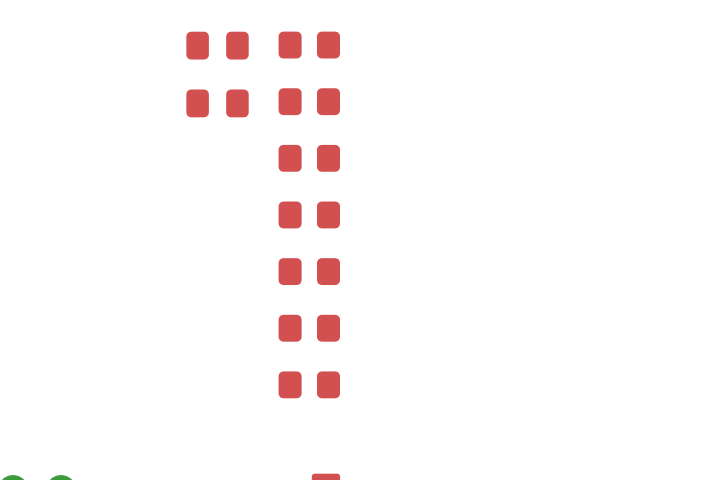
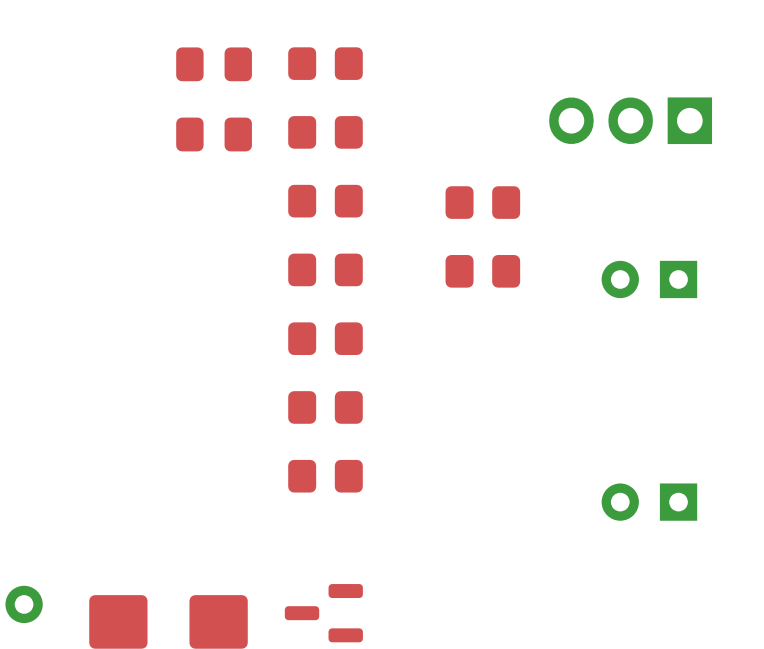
part: none -> (630, 120)
part: none -> (482, 202)
part: none -> (482, 271)
part: none -> (649, 279)
part: none -> (649, 502)

